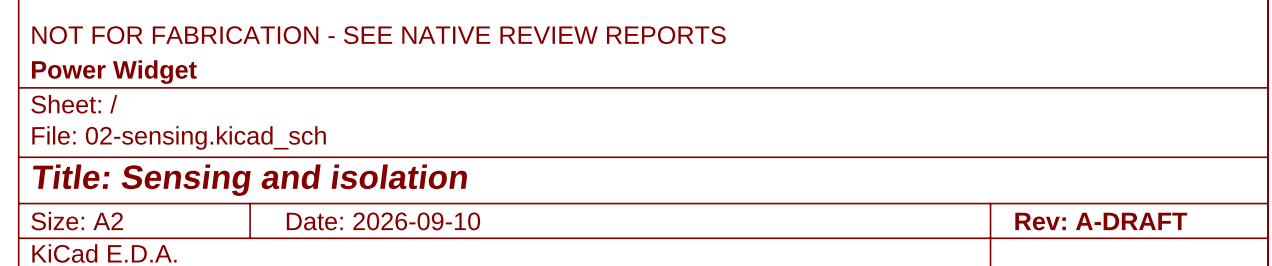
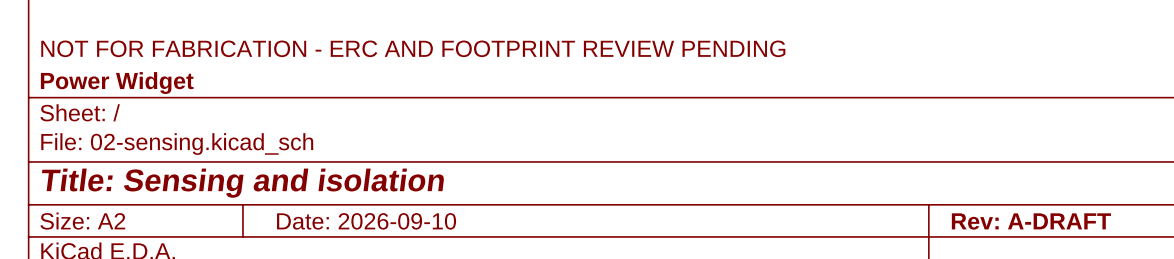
title block: NOT FOR FABRICATION - SEE NATIVE REVIEW REPORTS (379, 35) -> NOT FOR FABRICATION - ERC AND FOOTPRINT REVIEW PENDING (413, 48)

